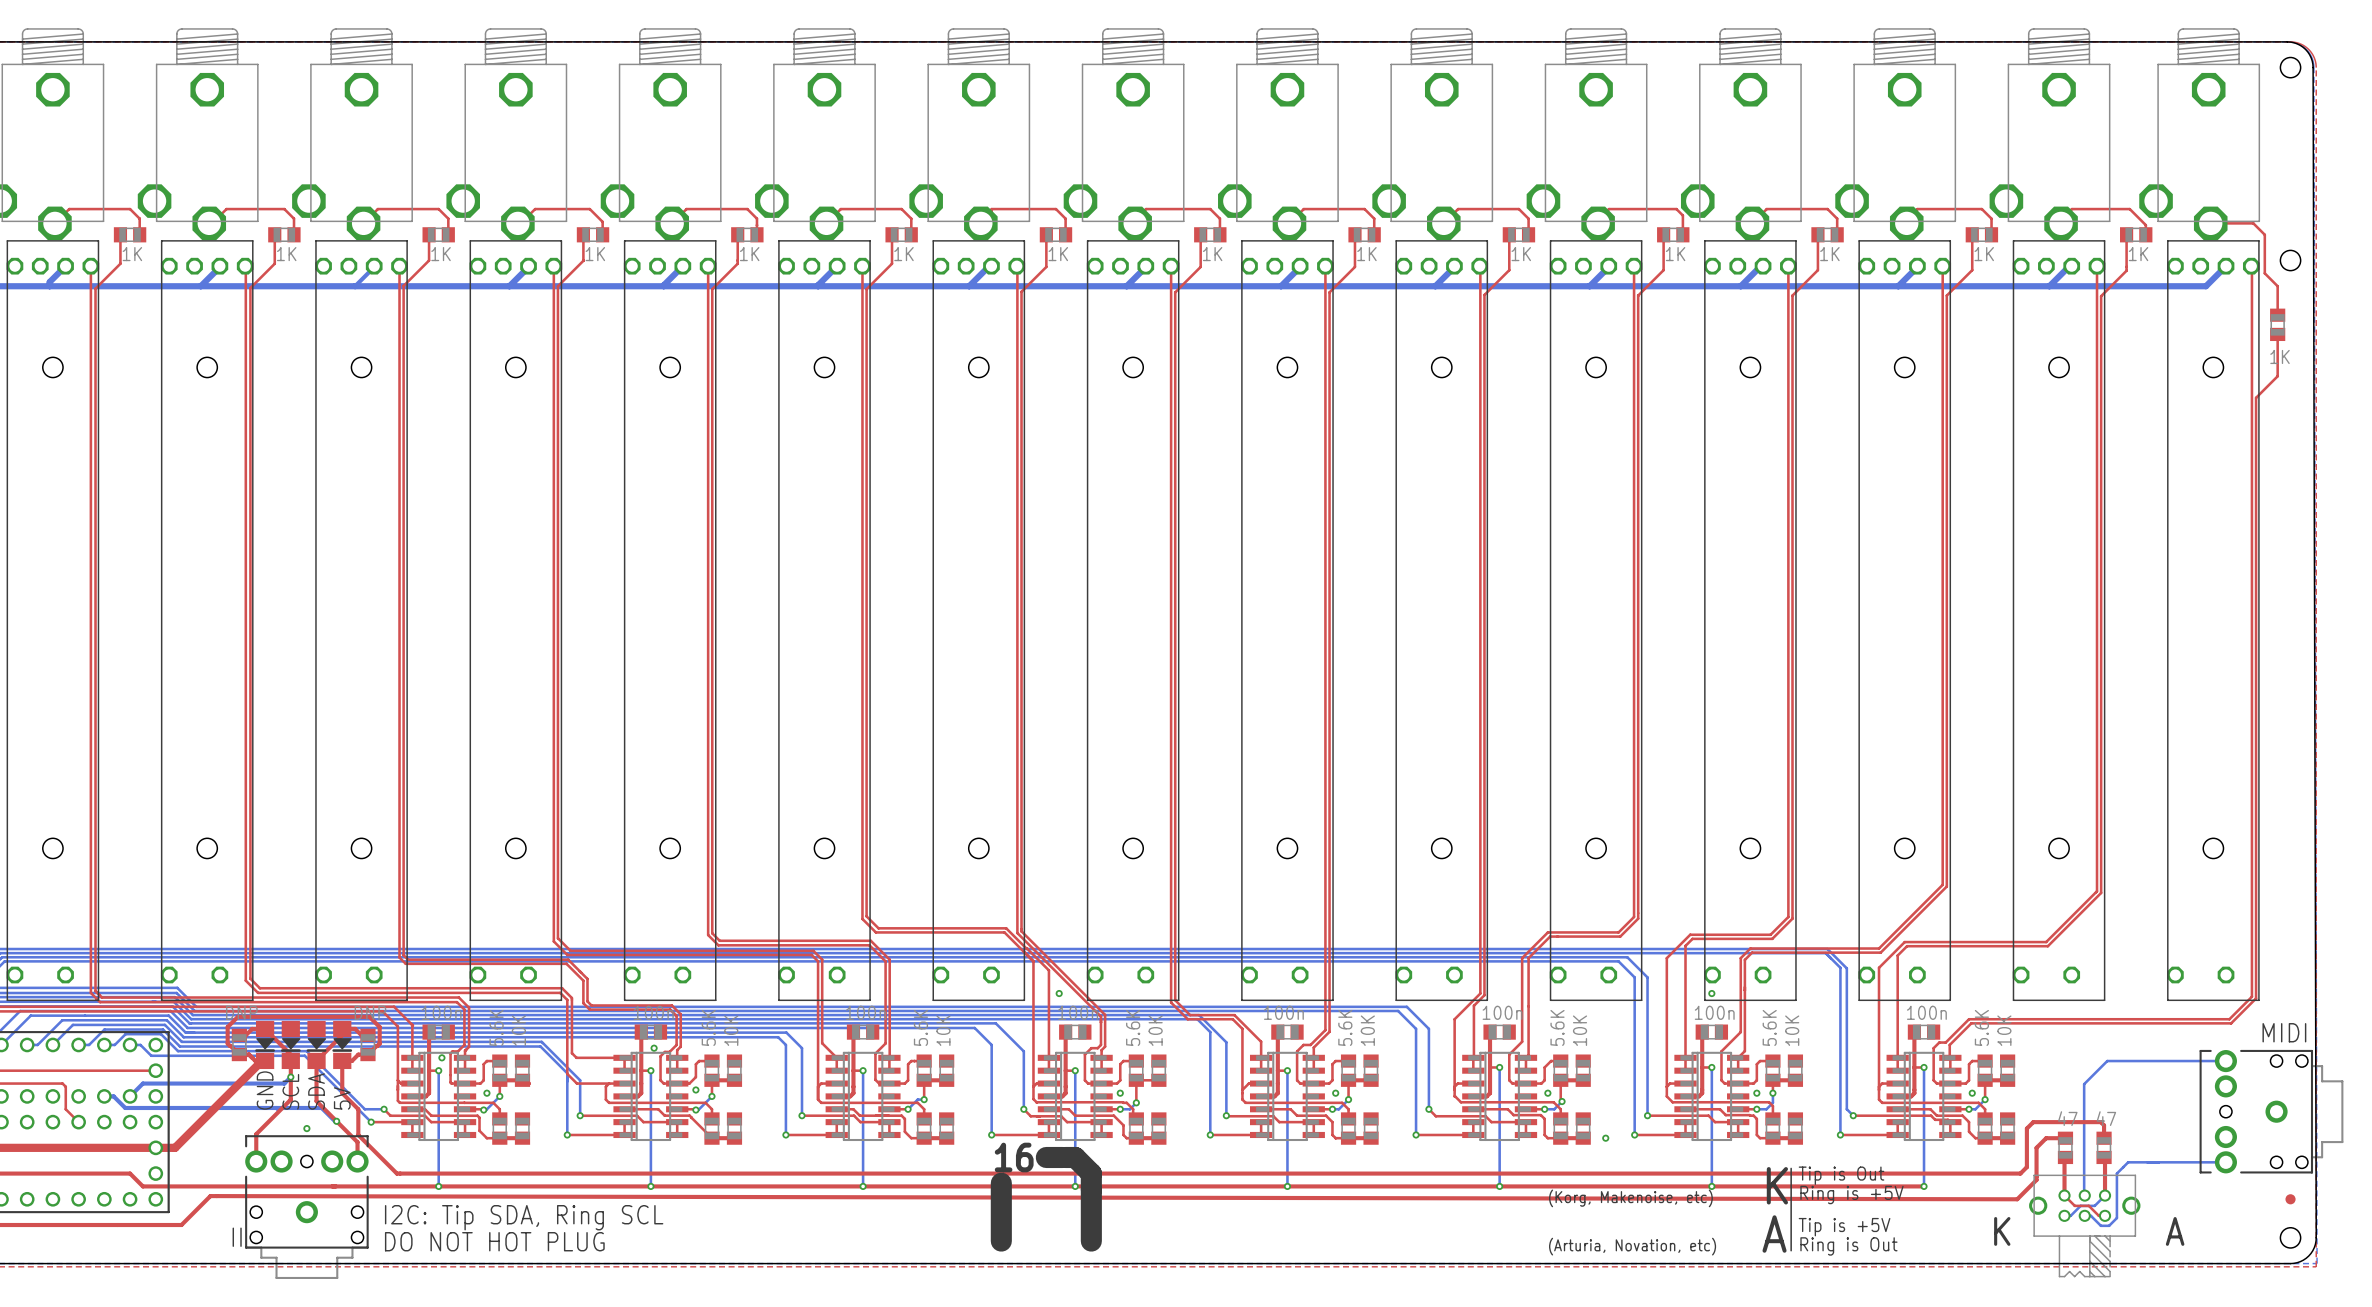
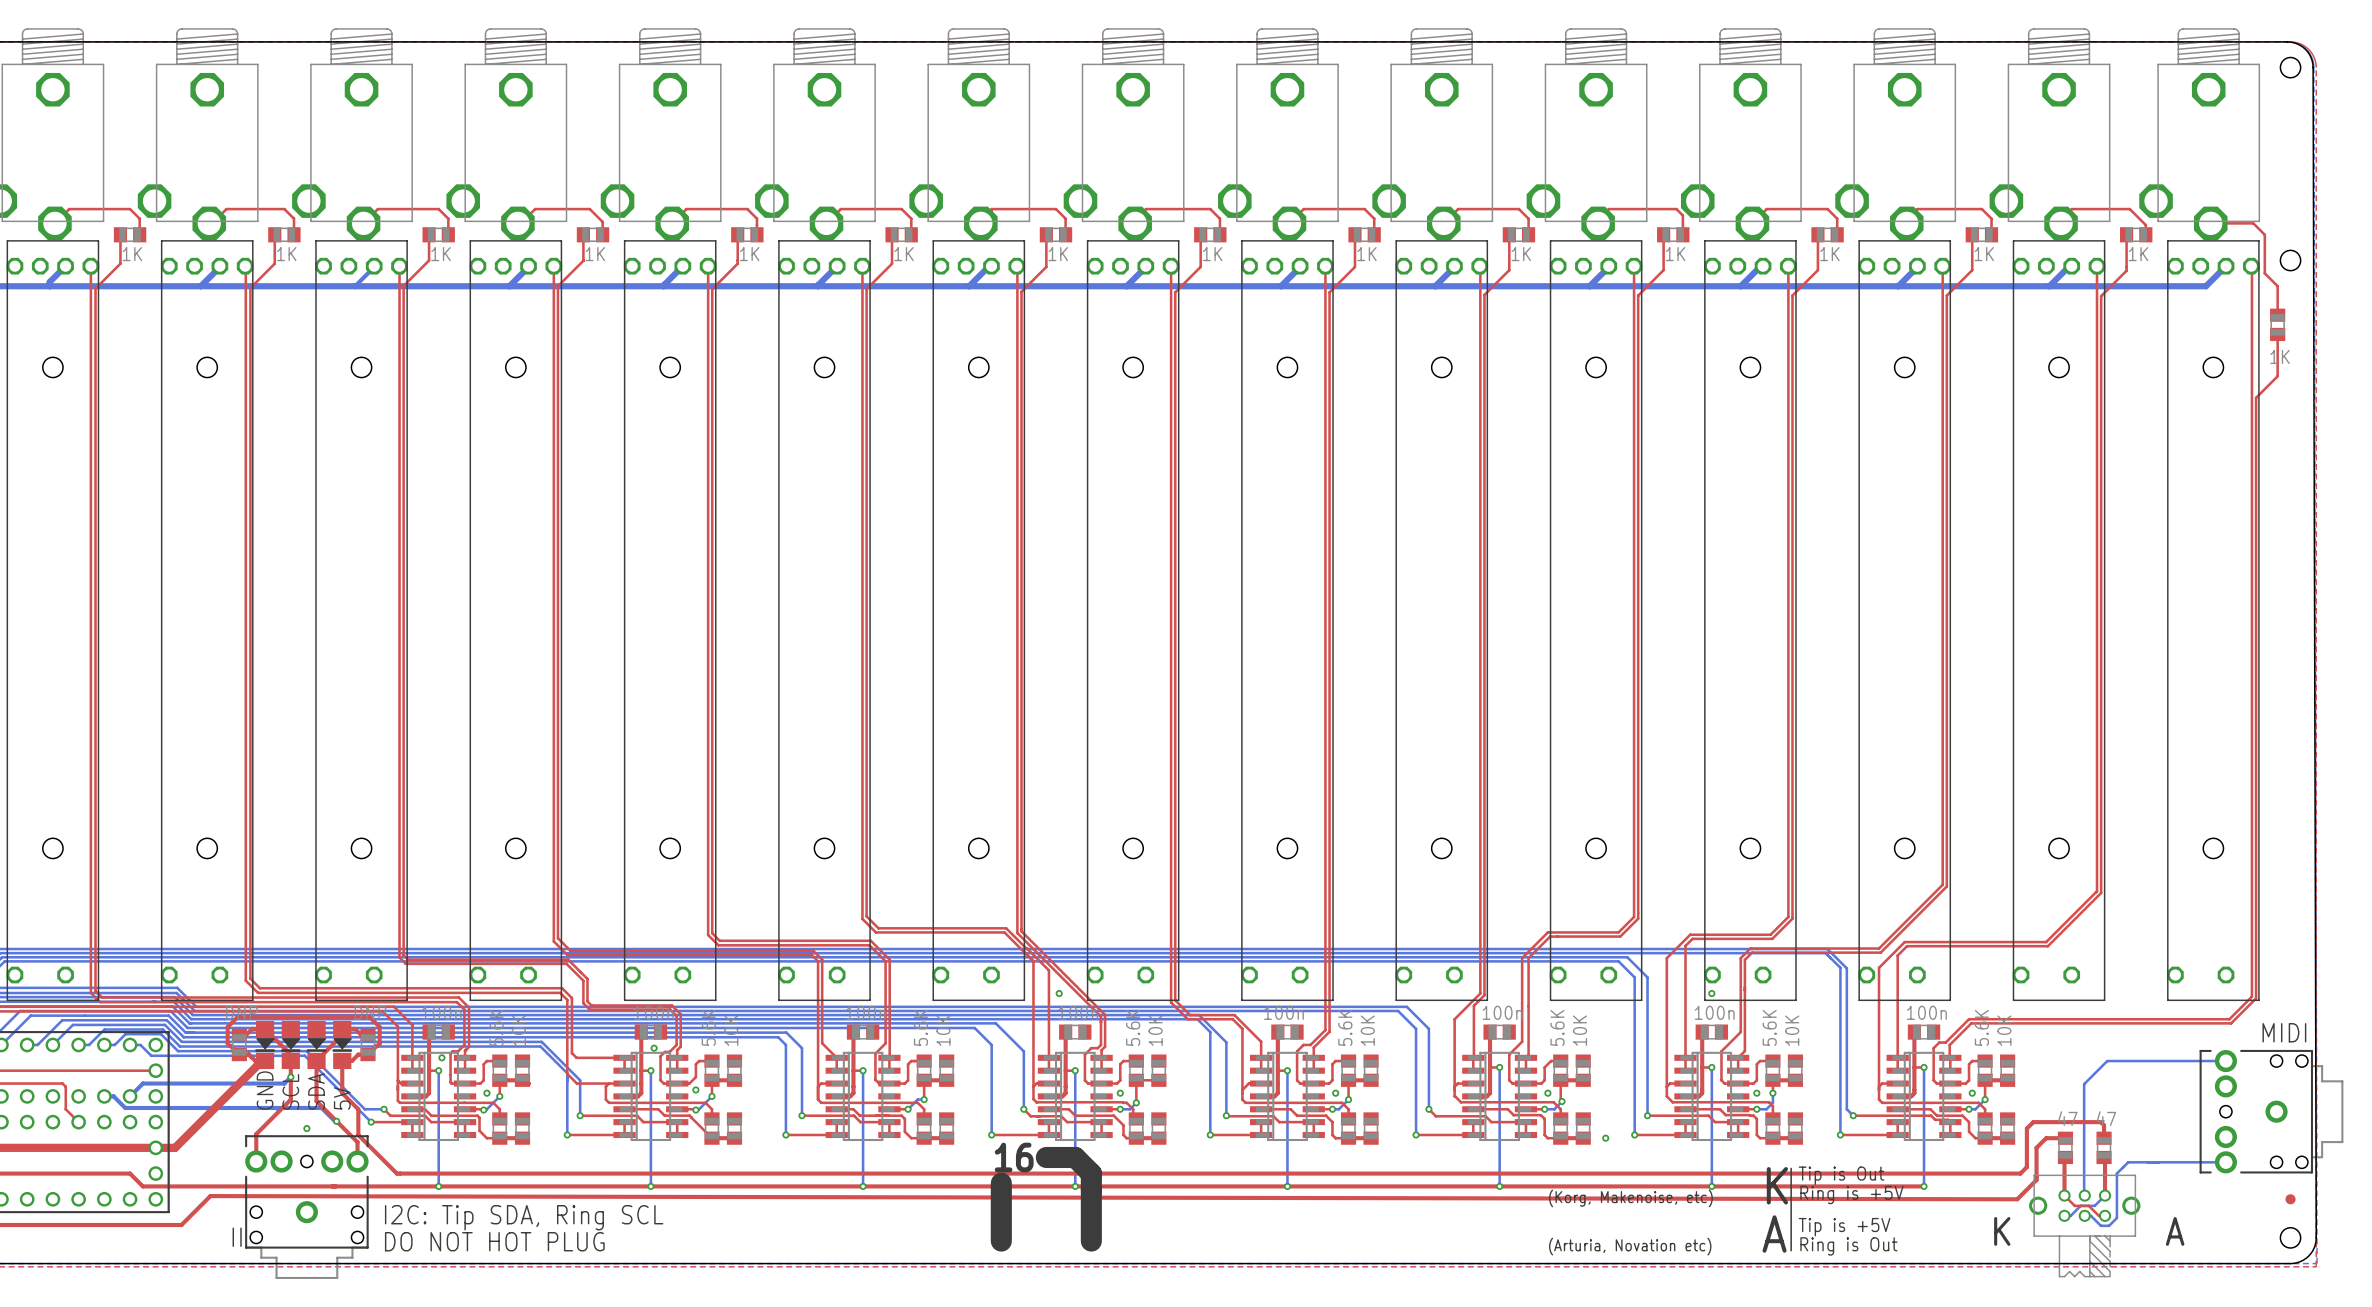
text: (Arturia, Novation, etc) (1632, 1246) -> (Arturia, Novation etc) (1630, 1246)

